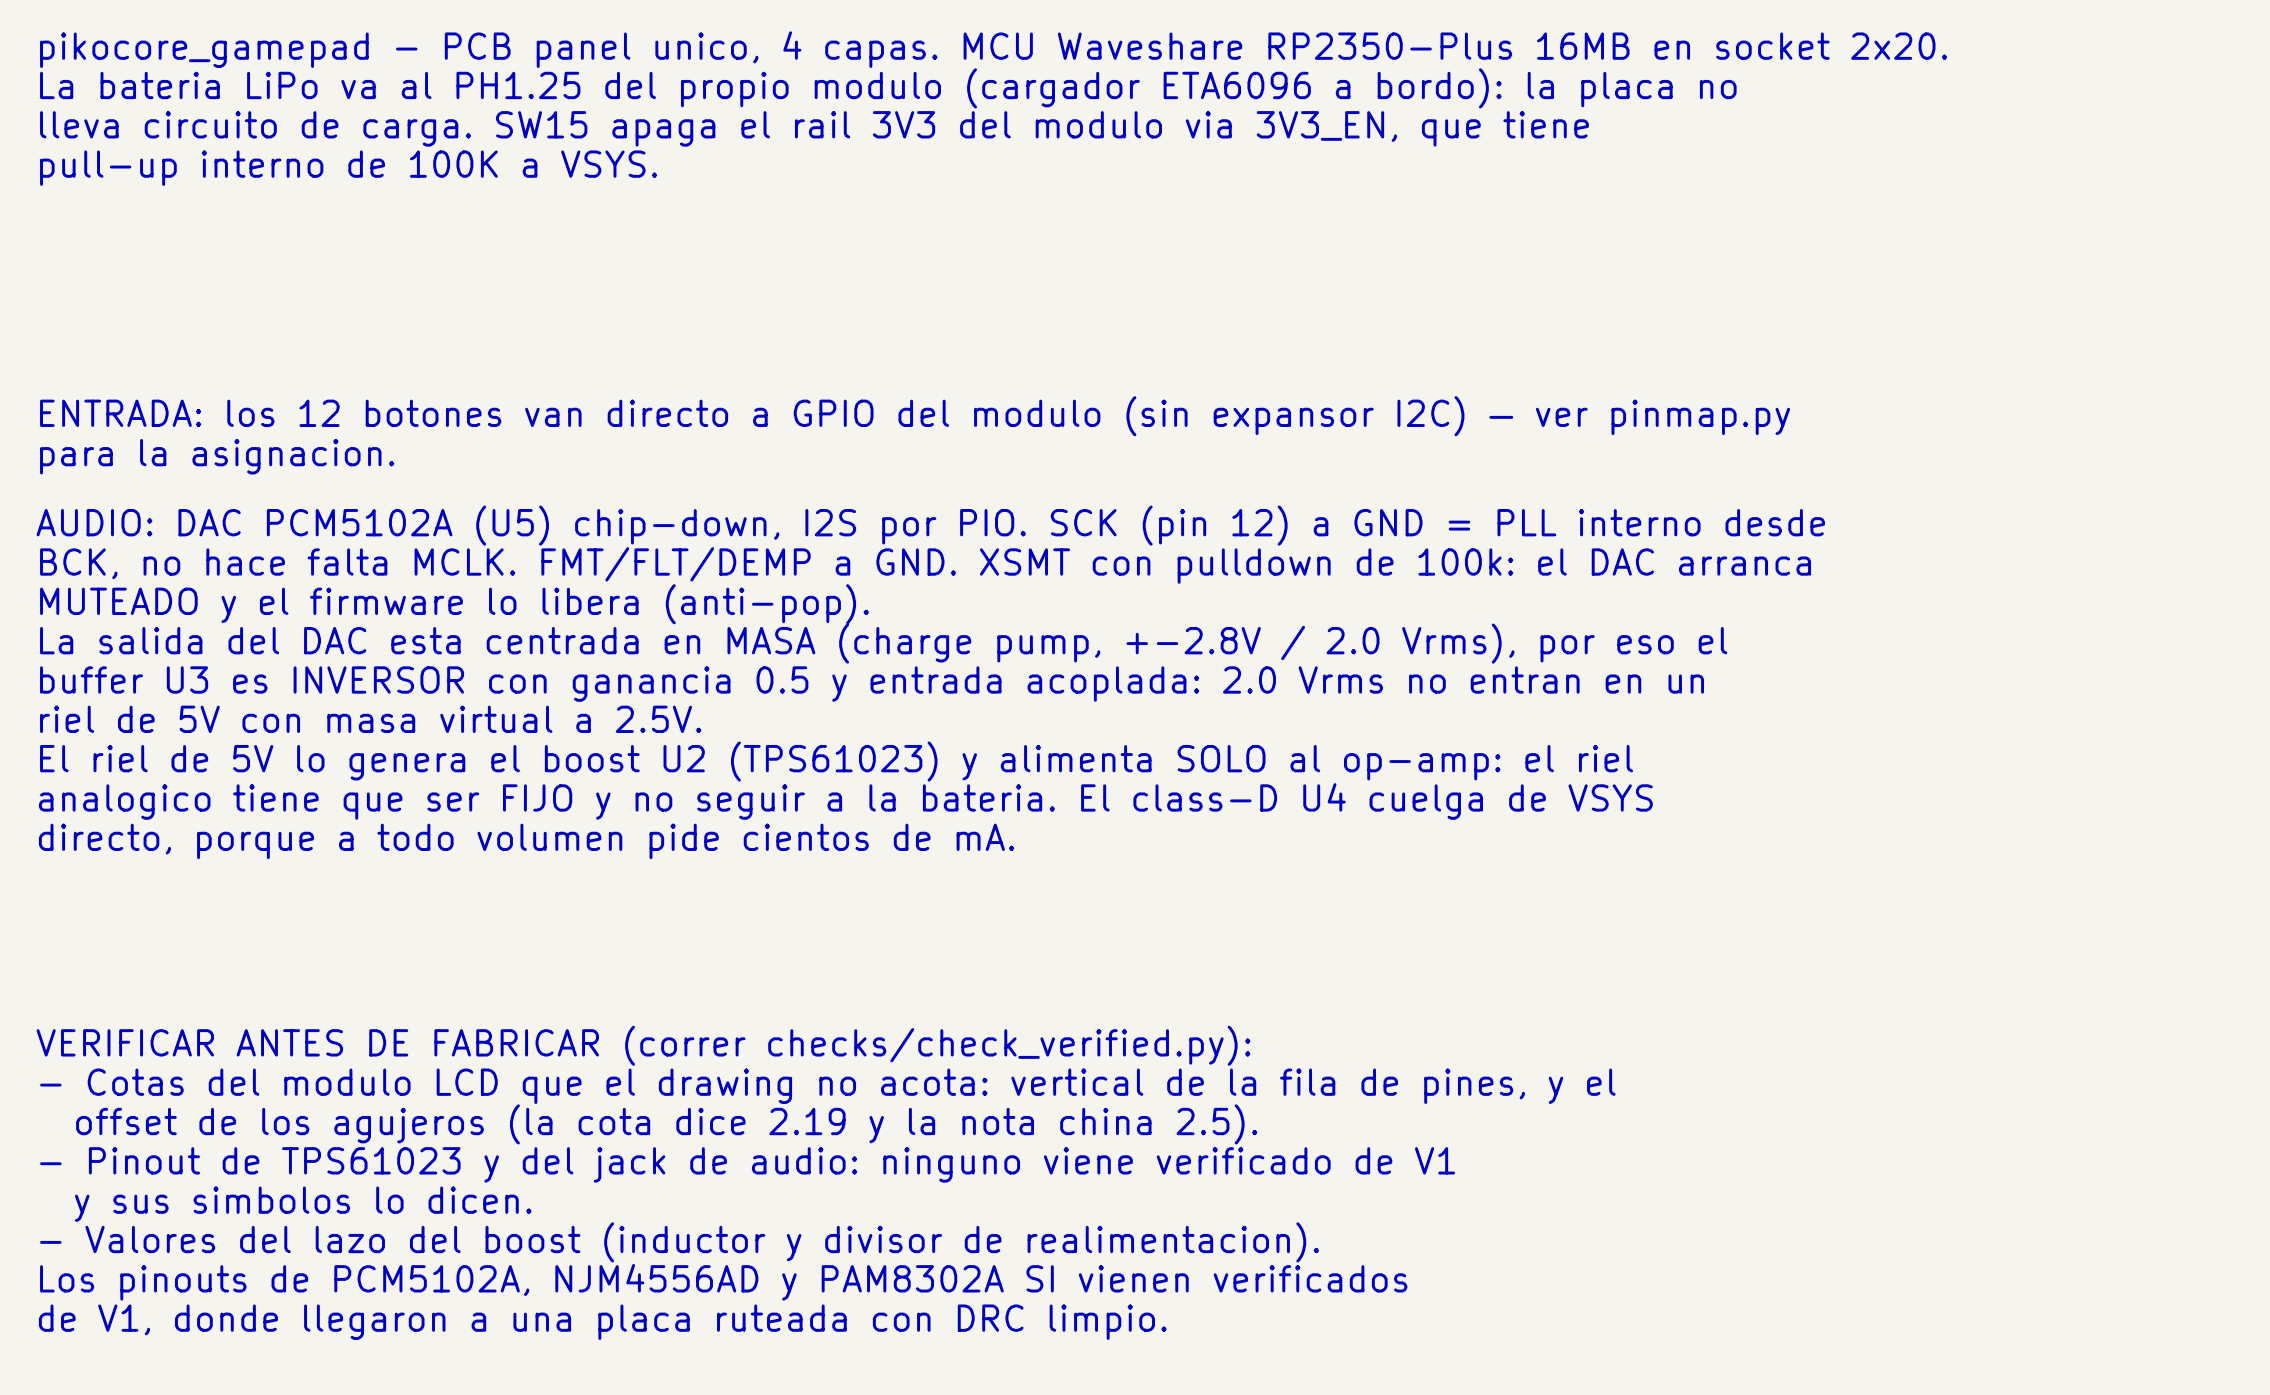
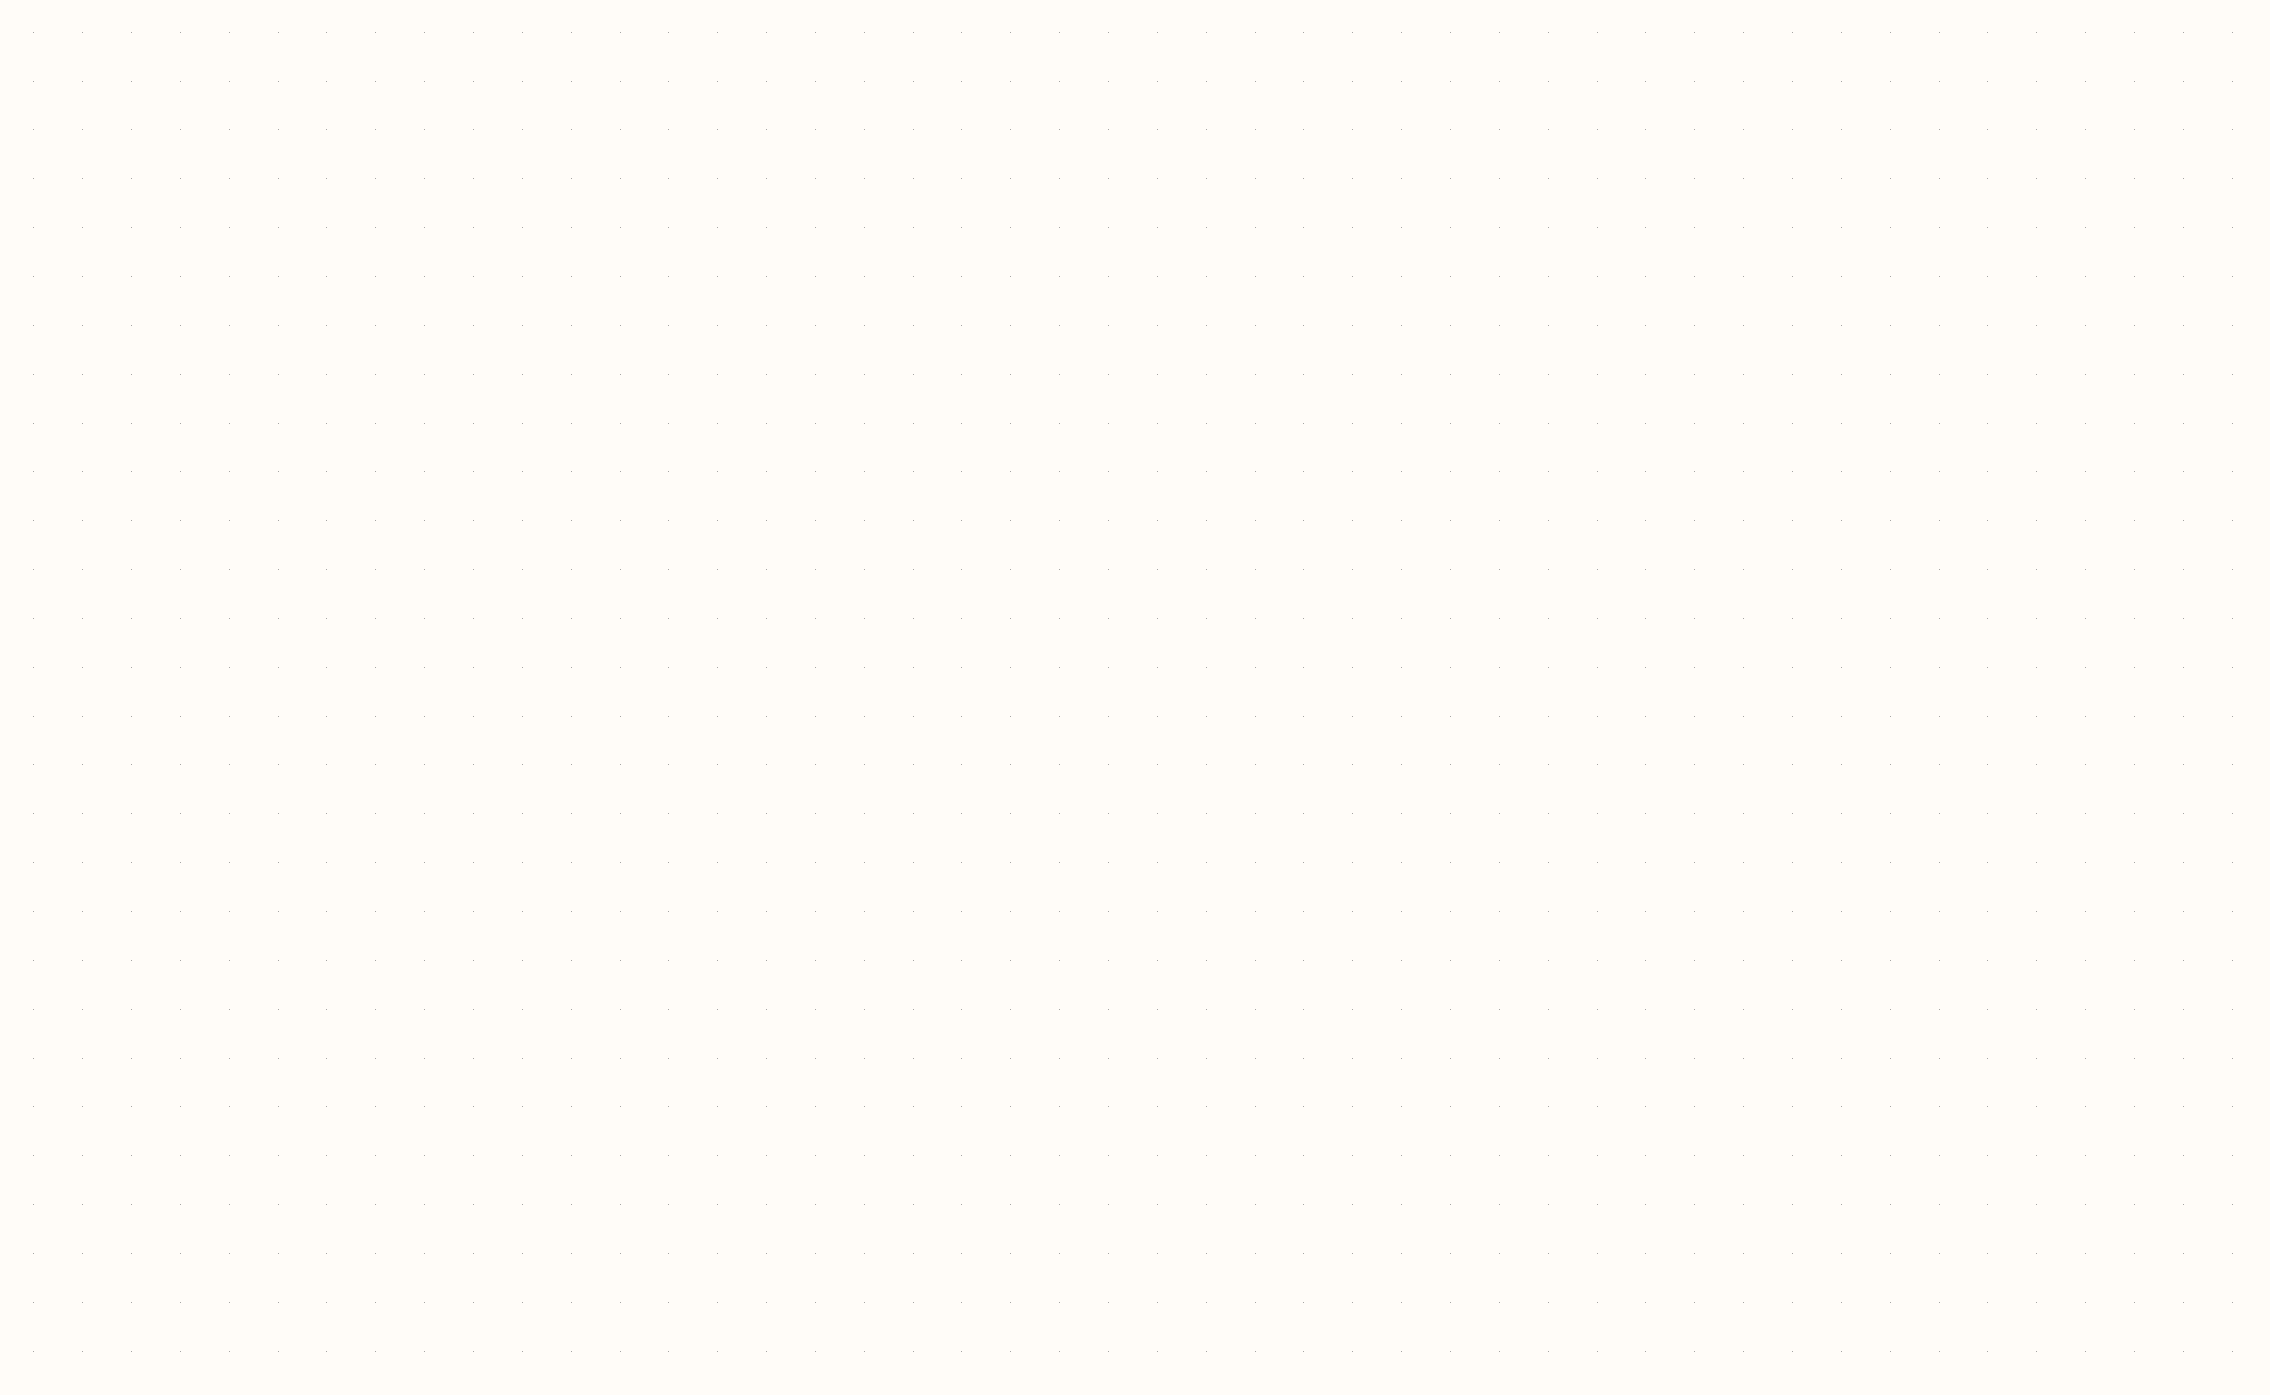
text: pikocore_gamepad - PCB panel unico, 4 capas. MCU Waveshare RP2350-Plus 16MB en socket 2x20. (993, 49) -> none
text: La bateria LiPo va al PH1.25 del propio modulo (cargador ETA6096 a bordo): la placa no (888, 88) -> none
text: lleva circuito de carga. SW15 apaga el rail 3V3 del modulo via 3V3_EN, que tiene (814, 128) -> none
text: pull-up interno de 100K a VSYS. (348, 168) -> none
text: ENTRADA: los 12 botones van directo a GPIO del modulo (sin expansor I2C) — ver pinmap.py (915, 416) -> none
text: para la asignacion. (217, 456) -> none
text: AUDIO: DAC PCM5102A (U5) chip-down, I2S por PIO. SCK (pin 12) a GND = PLL interno desde (930, 525) -> none
text: BCK, no hace falta MCLK. FMT/FLT/DEMP a GND. XSMT con pulldown de 100k: el DAC arranca (925, 565) -> none
text: MUTEADO y el firmware lo libera (anti-pop). (454, 604) -> none
text: La salida del DAC esta centrada en MASA (charge pump, +-2.8V / 2.0 Vrms), por eso el (883, 643) -> none
text: buffer U3 es INVERSOR con ganancia 0.5 y entrada acoplada: 2.0 Vrms no entran en un (872, 684) -> none
text: riel de 5V con masa virtual a 2.5V. (370, 719) -> none
text: El riel de 5V lo genera el boost U2 (TPS61023) y alimenta SOLO al op-amp: el riel (836, 761) -> none
text: analogico tiene que ser FIJO y no seguir a la bateria. El class-D U4 cuelga de VSYS (845, 801) -> none
text: directo, porque a todo volumen pide cientos de mA. (526, 841) -> none
text: VERIFICAR ANTES DE FABRICAR (correr checks/check_verified.py): (643, 1045) -> none
text: - Cotas del modulo LCD que el drawing no acota: vertical de la fila de pines, y el (827, 1086) -> none
text: offset de los agujeros (la cota dice 2.19 y la nota china 2.5). (666, 1124) -> none
text: - Pinout de TPS61023 y del jack de audio: ninguno viene verificado de V1 (747, 1164) -> none
text: y sus simbolos lo dicen. (303, 1204) -> none
text: - Valores del lazo del boost (inductor y divisor de realimentacion). (679, 1242) -> none
text: Los pinouts de PCM5102A, NJM4556AD y PAM8302A SI vienen verificados (723, 1282) -> none
text: de V1, donde llegaron a una placa ruteada con DRC limpio. (602, 1322) -> none

